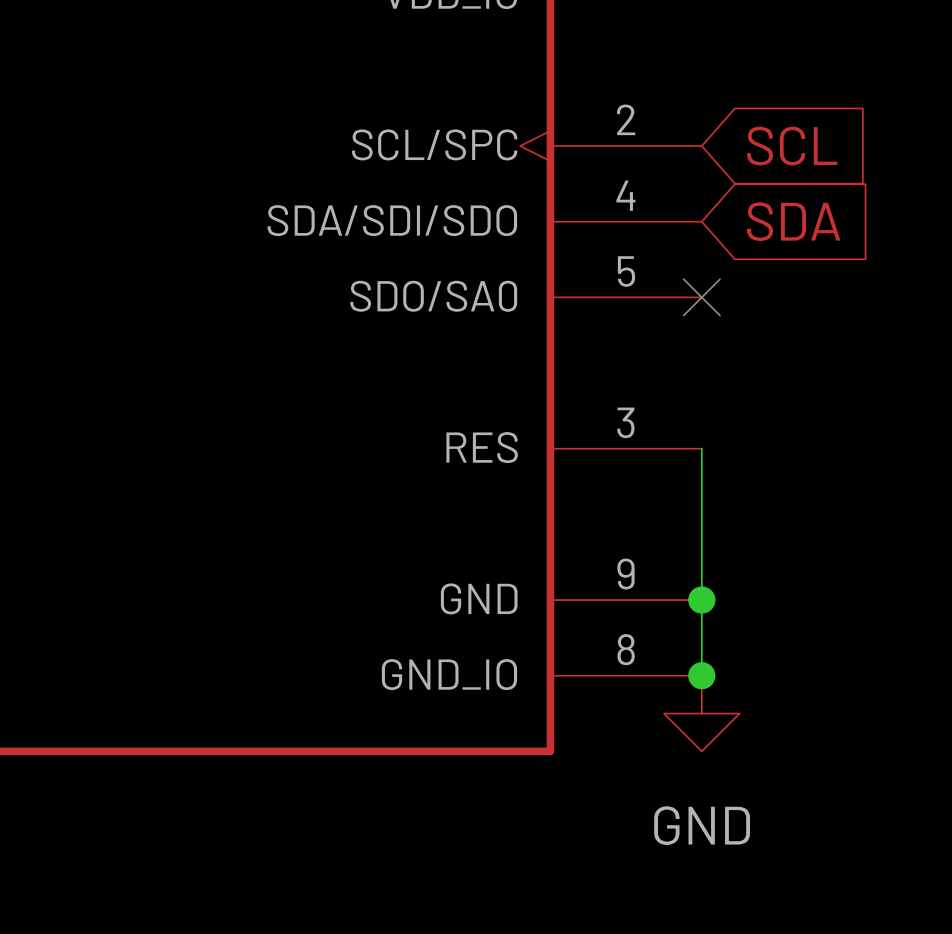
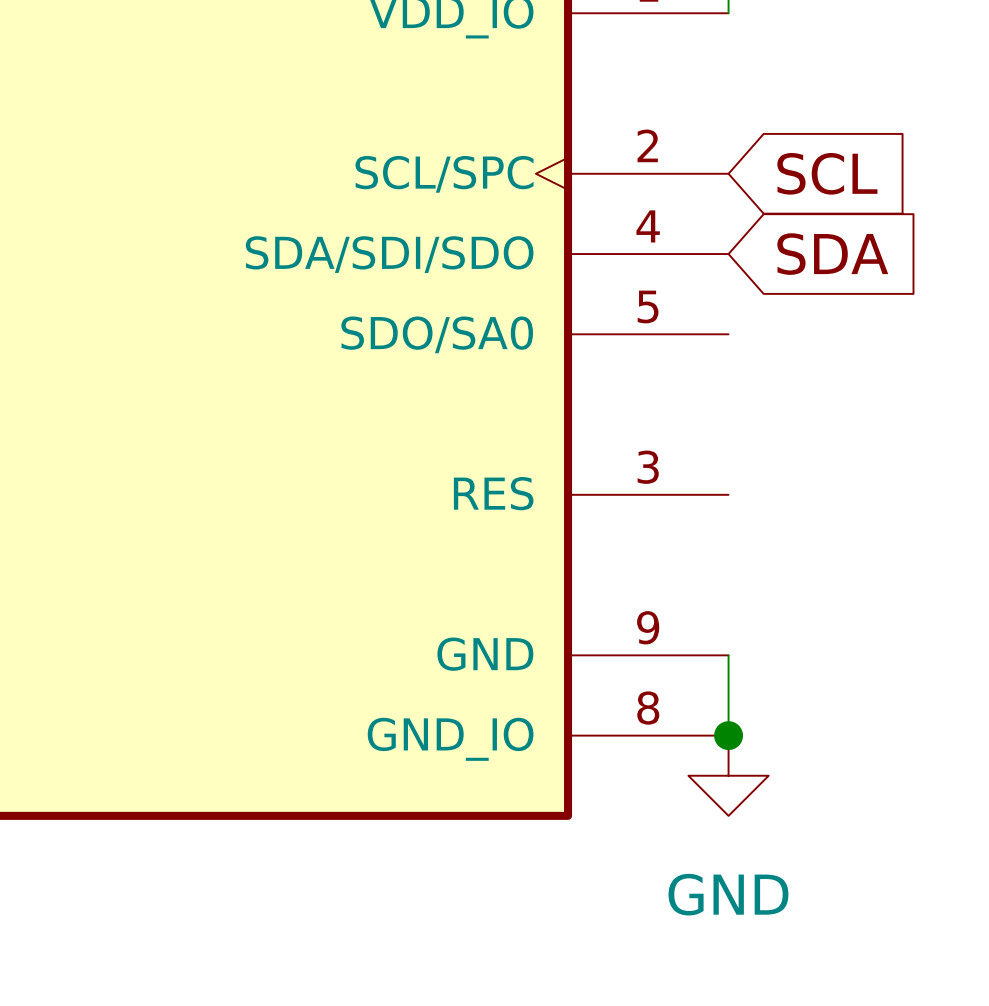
no-connect mark: (701, 297) -> none
wire: (701, 448) (701, 600) -> none
junction: (701, 600) -> none

